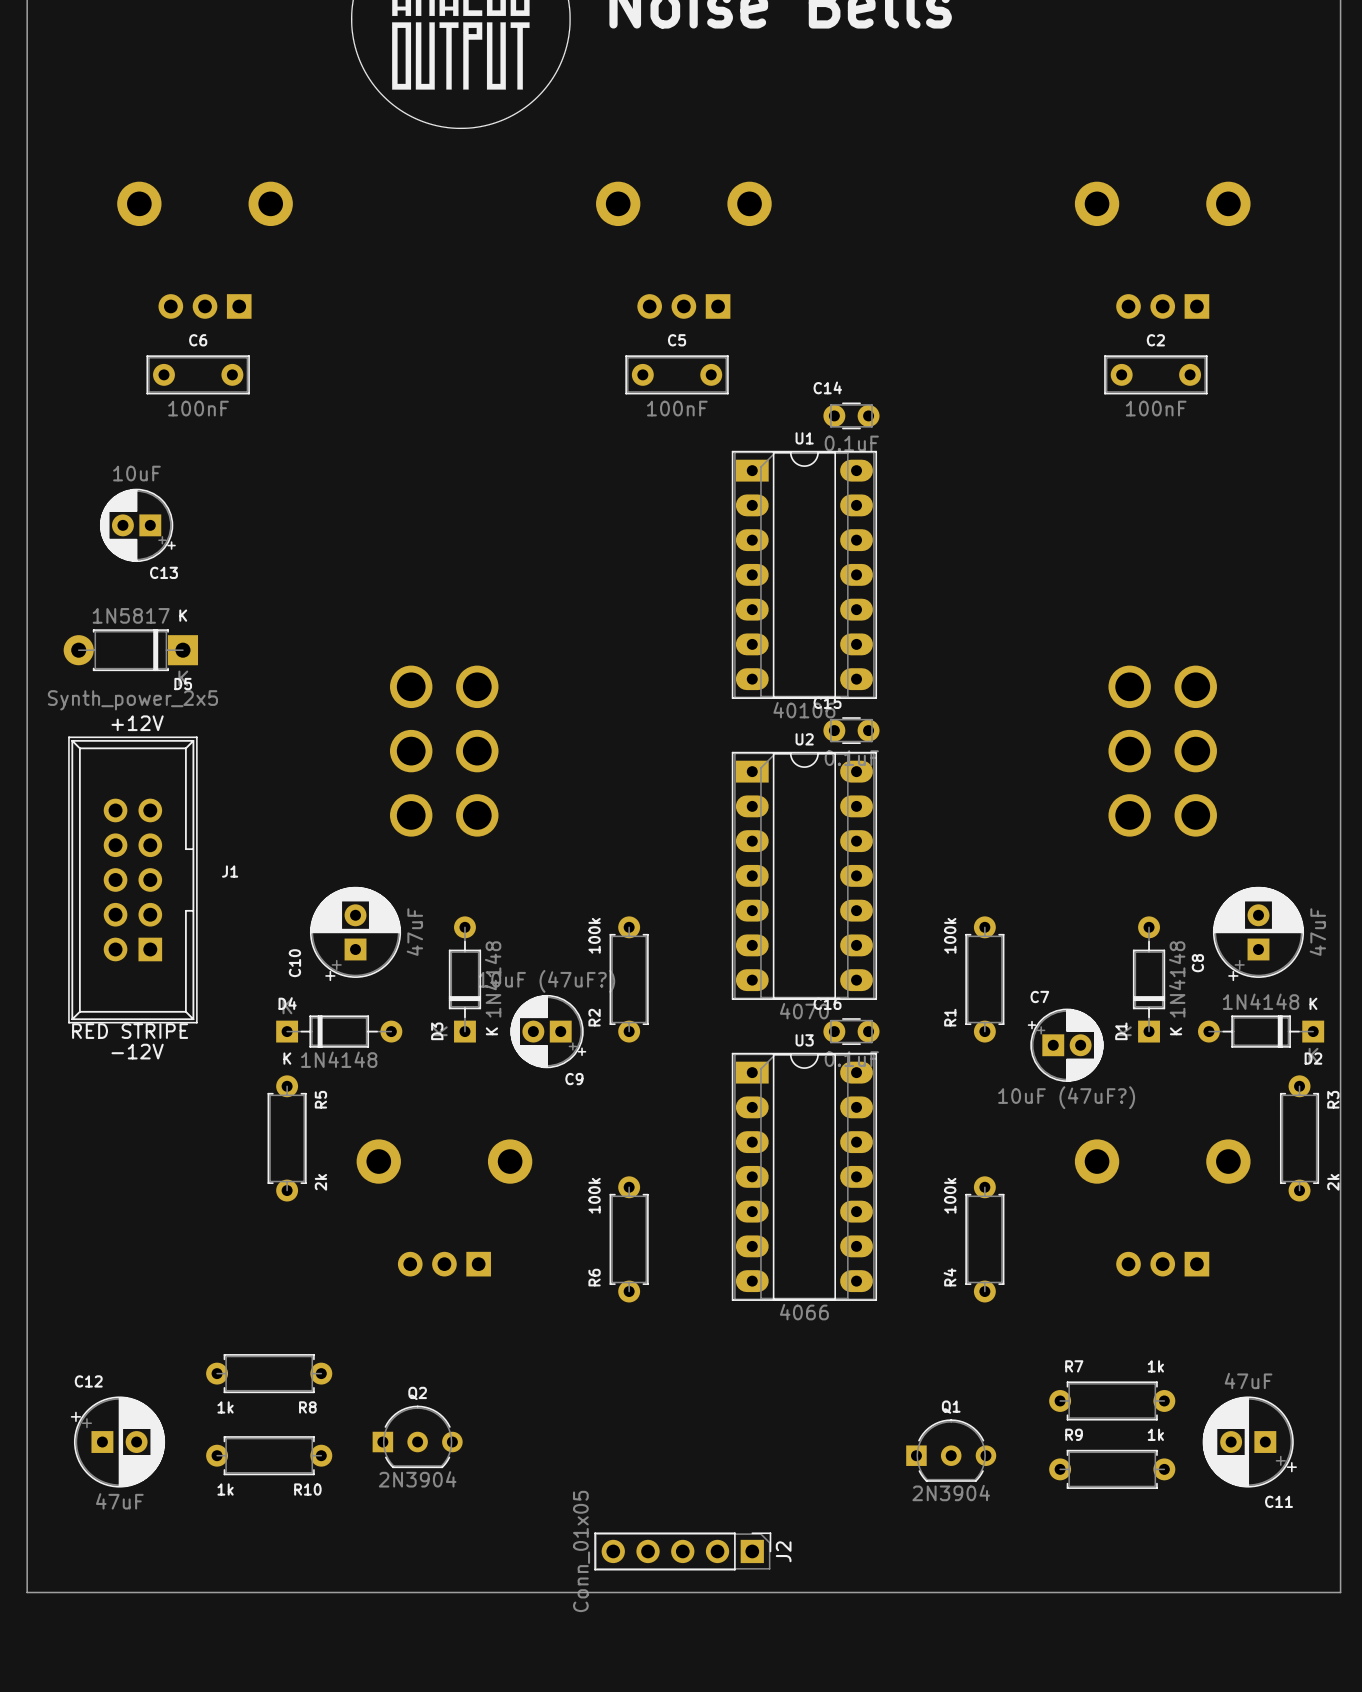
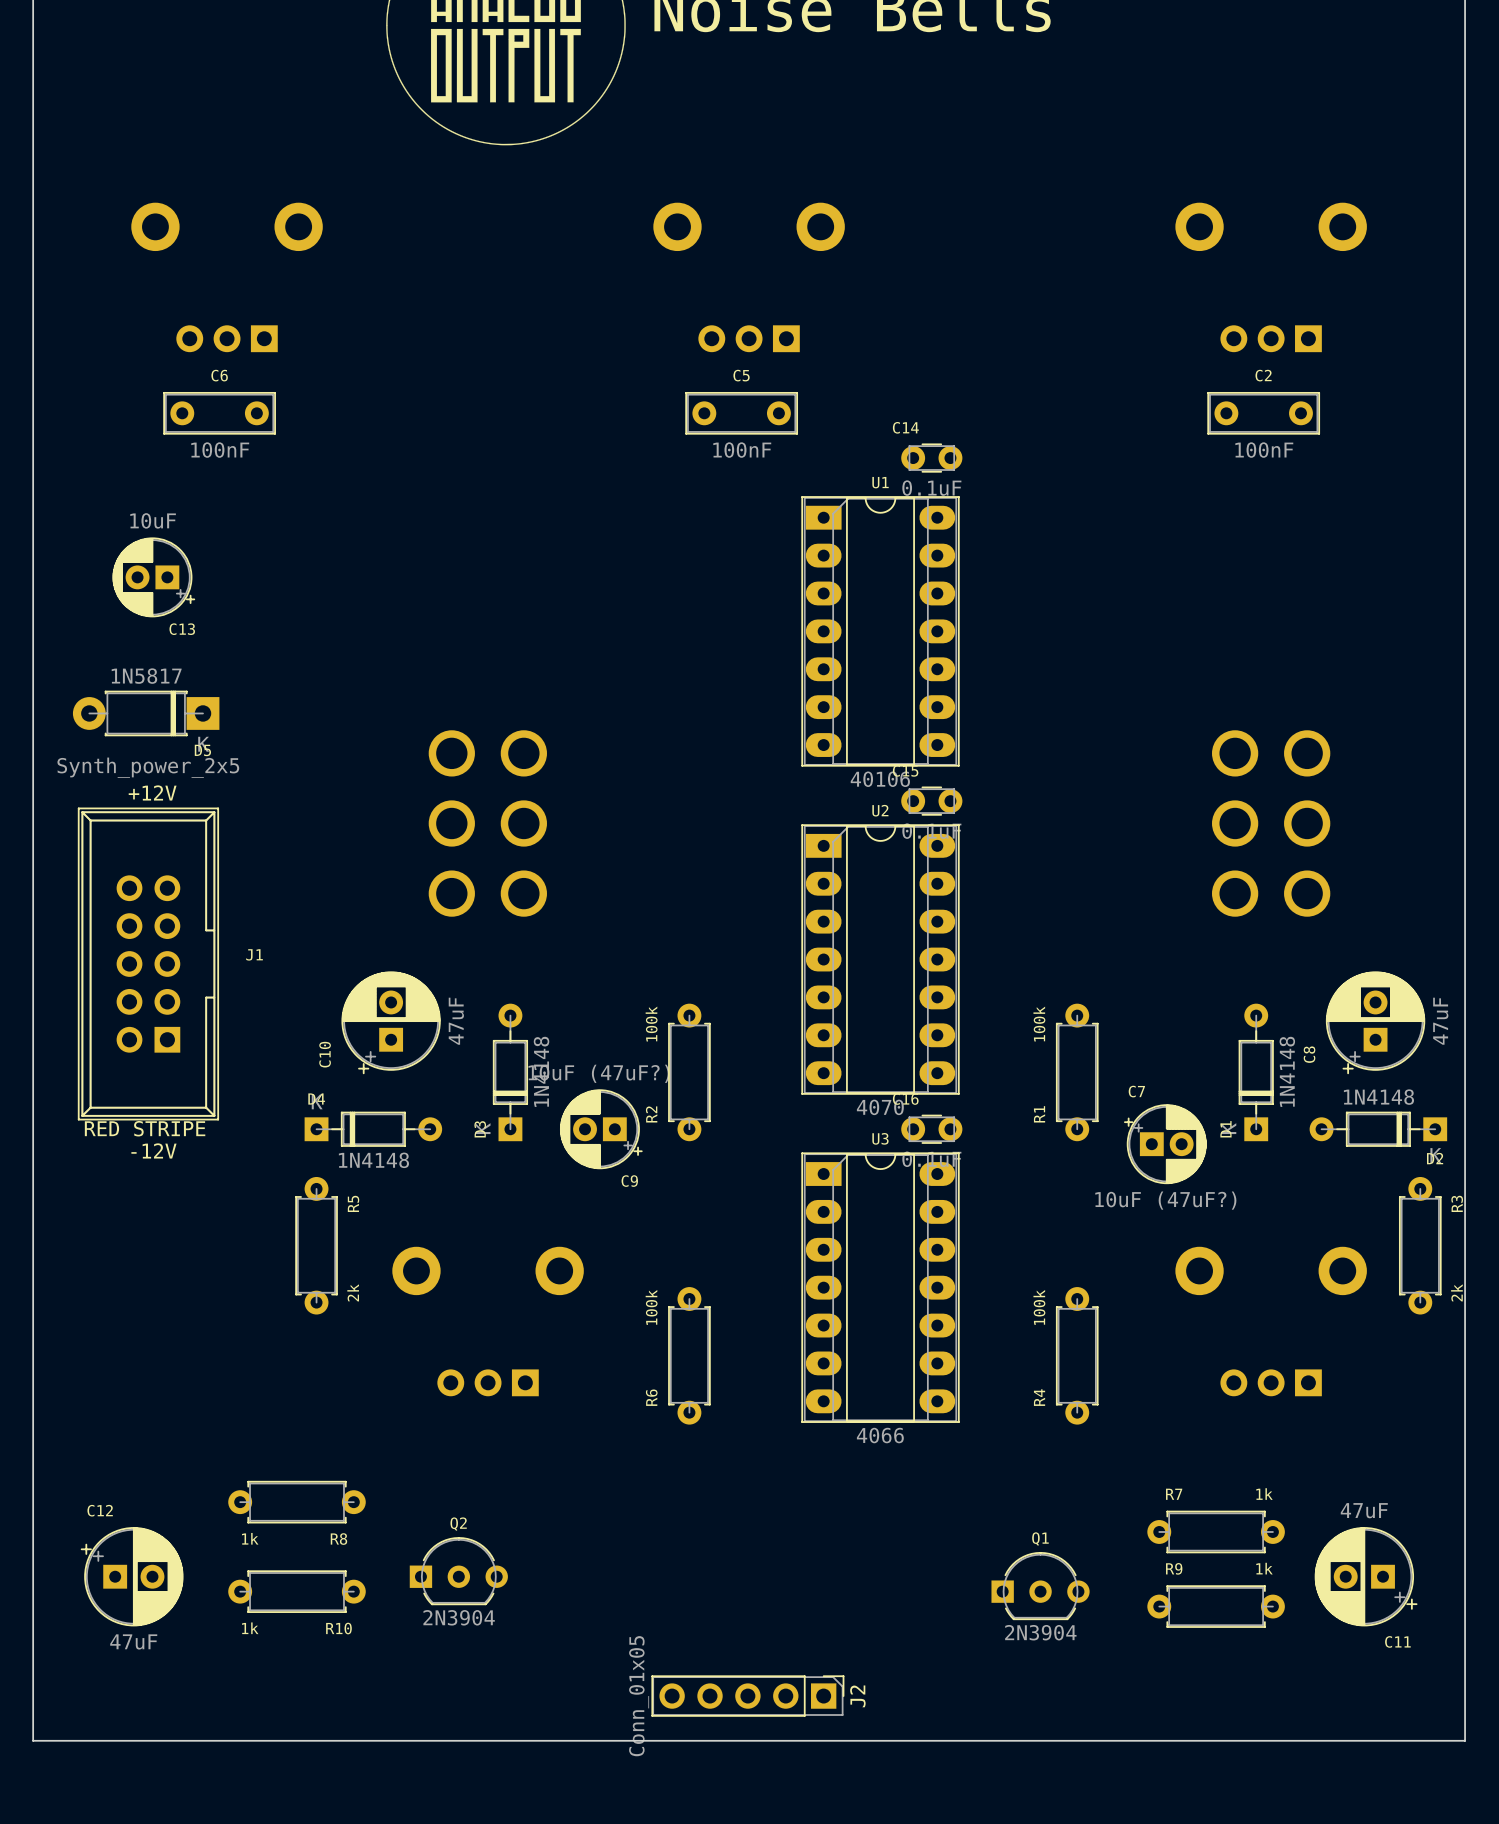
D5 text: K (183, 615) -> none
D2 text: K (1313, 1003) -> none
D3 text: K (491, 1031) -> none
D1 text: K (1176, 1031) -> none
D4 text: K (287, 1058) -> none

